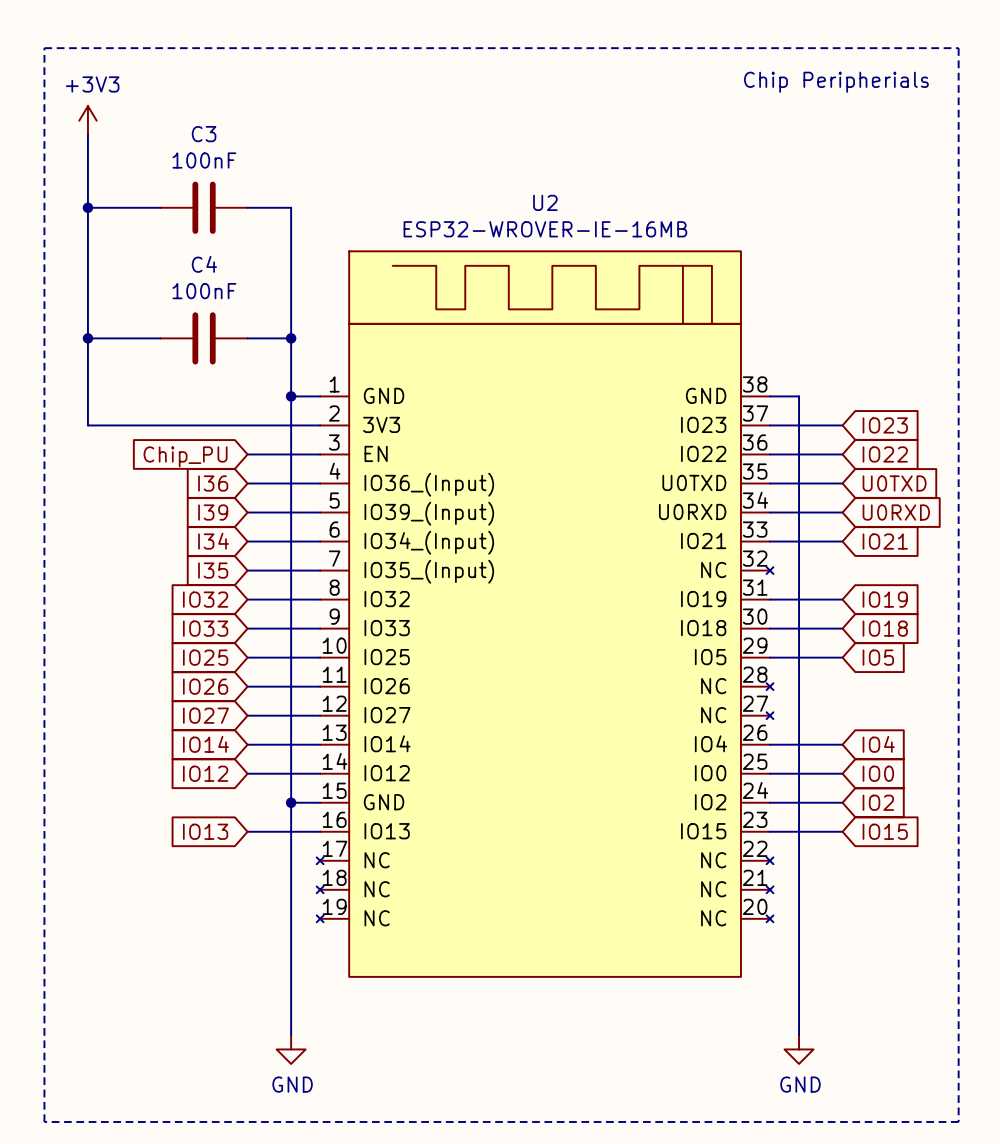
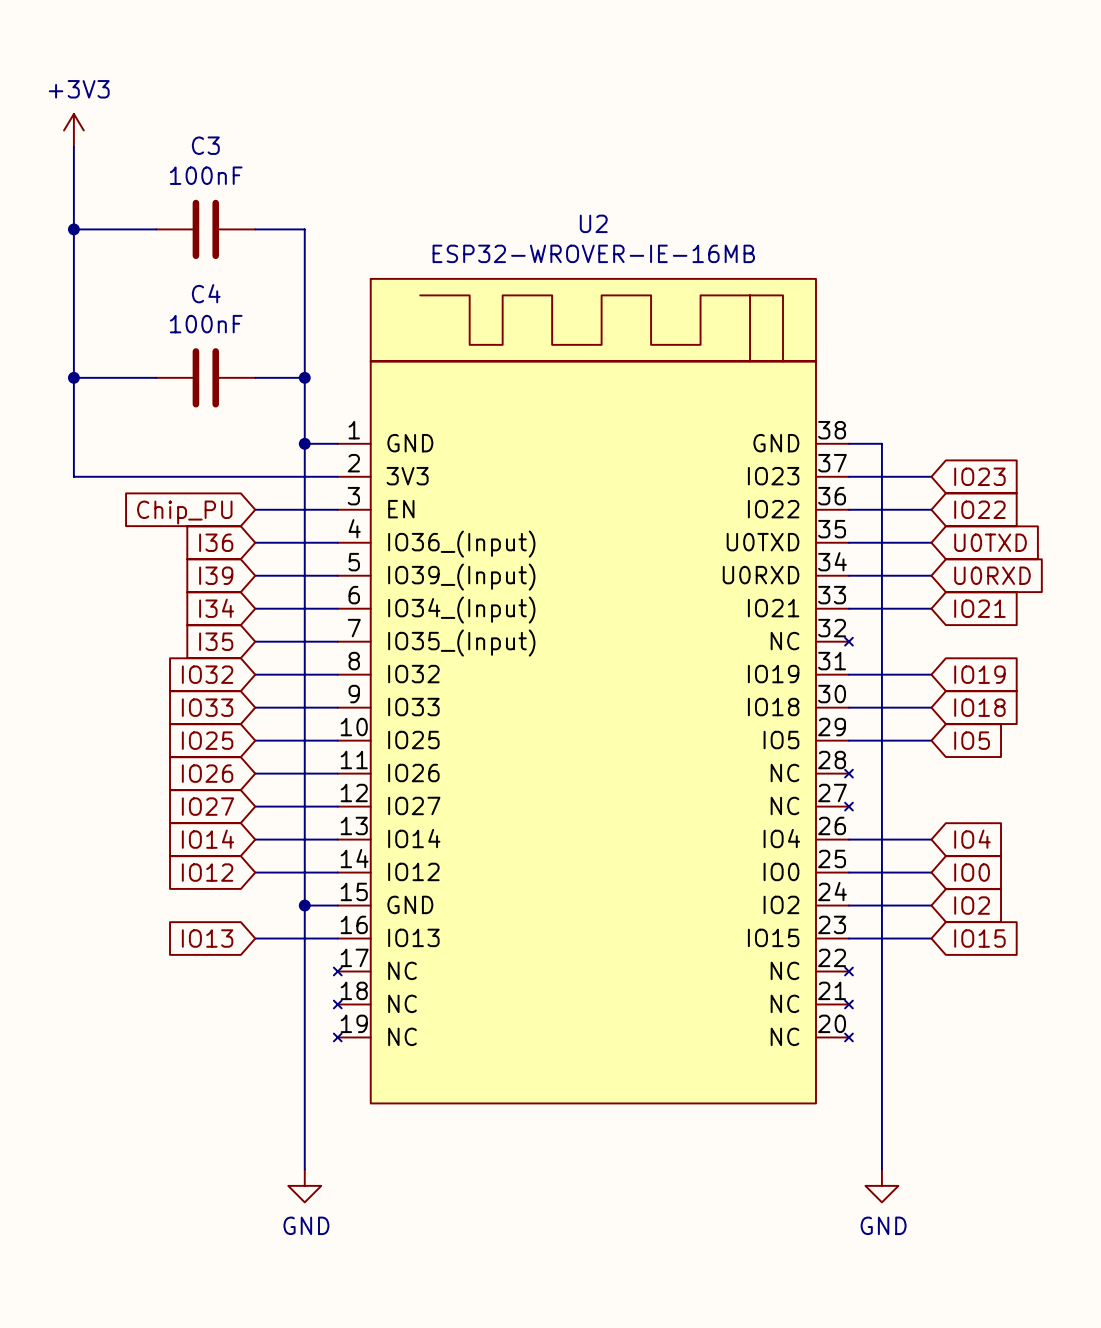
line: (44, 48) (958, 48) (958, 1121) (44, 1121) (44, 48) -> none
text: Chip Peripherials (836, 82) -> none

